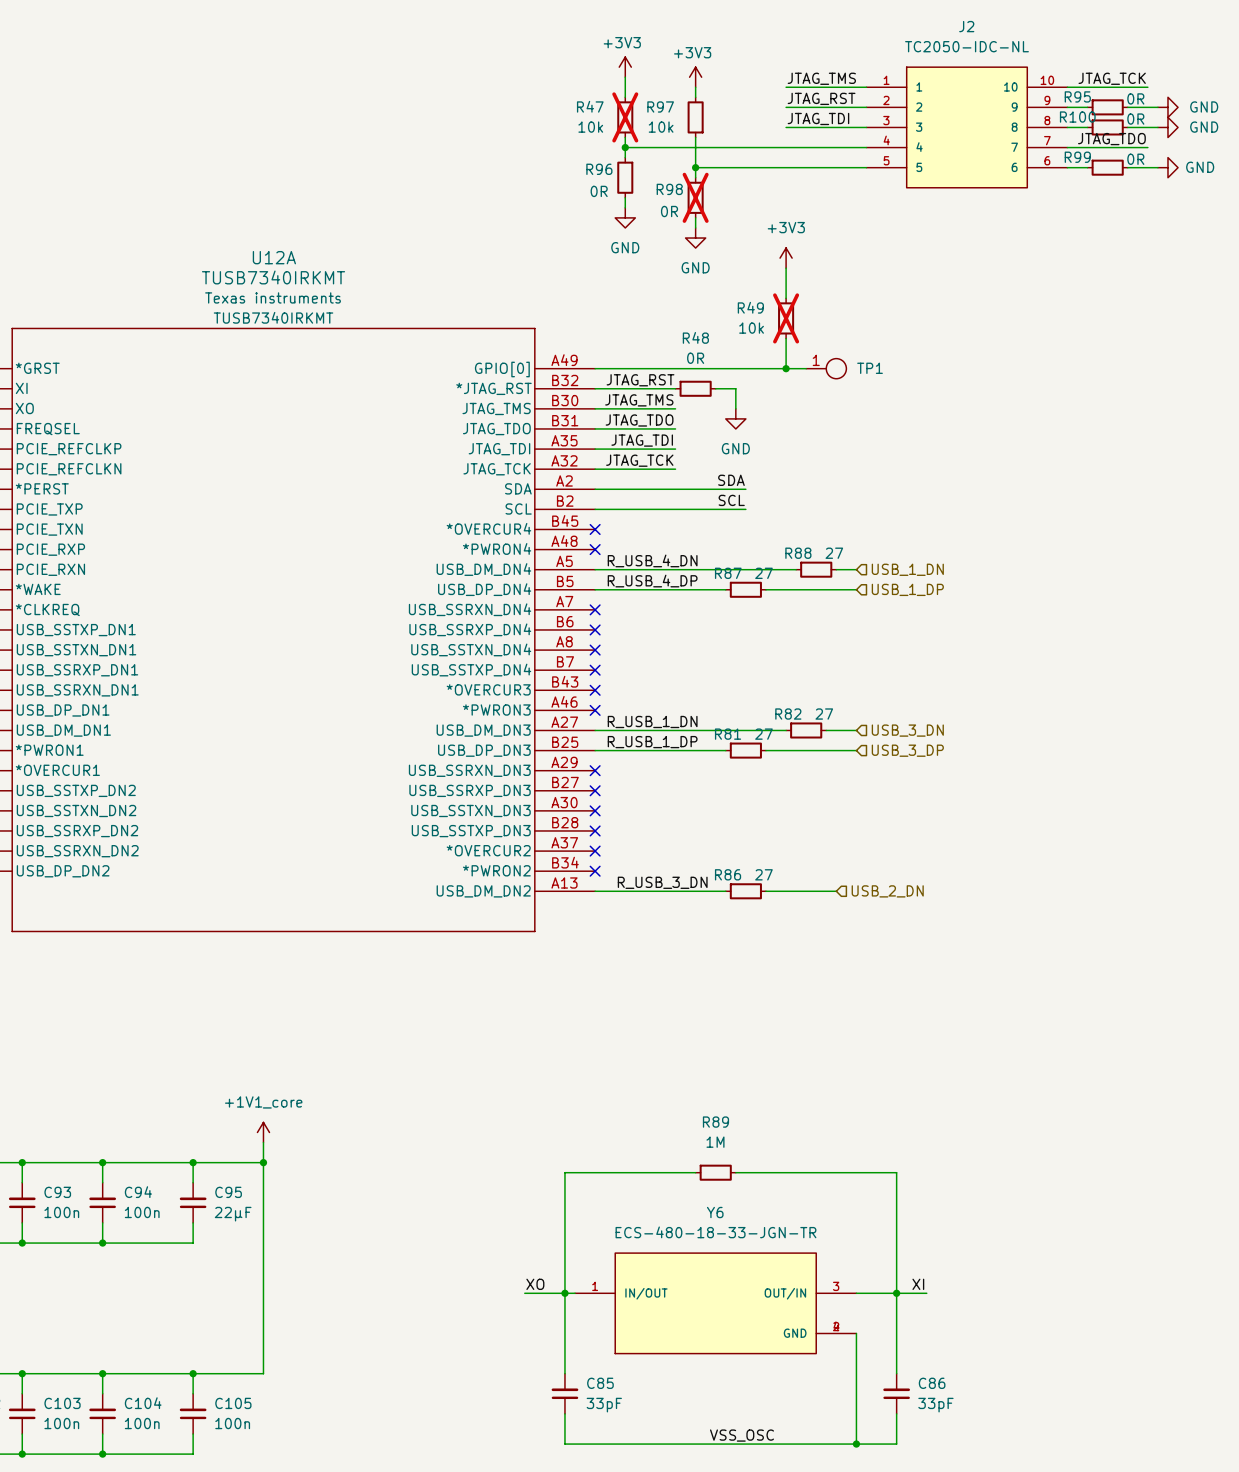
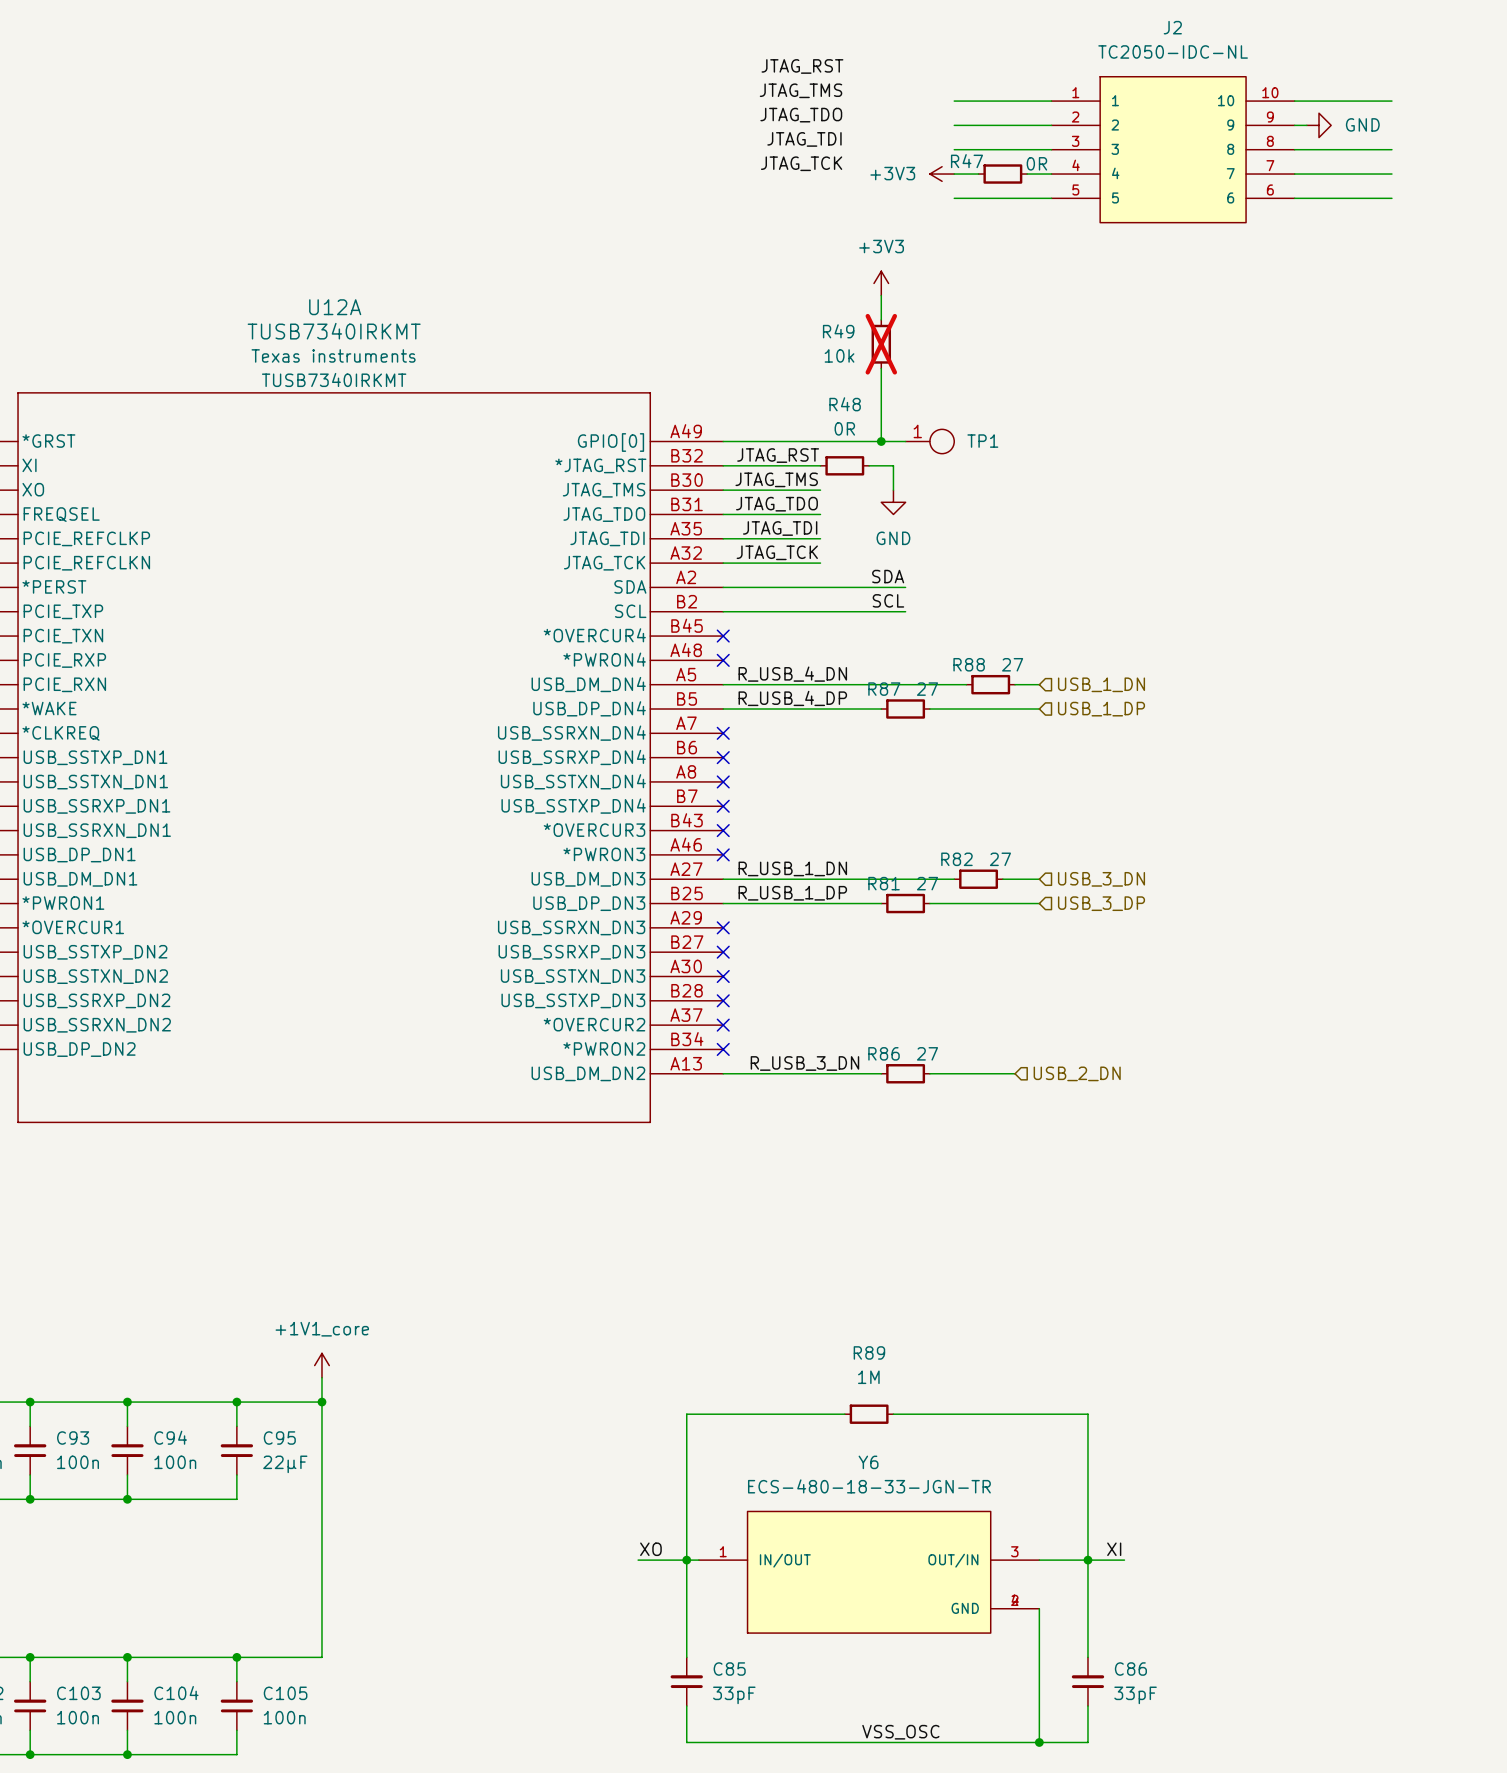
power symbol: +3V3 (625, 67) -> none
wire: (625, 77) (625, 97) -> none
power symbol: +3V3 (695, 77) -> none
label position: JTAG_TMS (821, 78) -> JTAG_TMS (801, 90)
label: JTAG_TCK (1112, 78) -> none
wire: (695, 87) (695, 97) -> none
label: none -> JTAG_TDO (801, 115)
label position: JTAG_RST (821, 98) -> JTAG_RST (802, 66)
power symbol: none -> GND (1319, 125)
R95: (1107, 107) -> none
wire: (1127, 107) (1157, 107) -> none
power symbol: GND (1167, 107) -> none
R47 rotation: 0° (625, 117) -> 90° clockwise (1002, 174)
R47 position: (625, 117) -> (1002, 174)
R47 do-not-place cross: (625, 117) -> none
R97: (695, 117) -> none
label position: JTAG_TDI (818, 118) -> JTAG_TDI (804, 139)
R47 text: 10k (590, 127) -> 0R (1036, 163)
wire: none -> (1319, 149) (1367, 149)
R100: (1107, 127) -> none
wire: (1147, 127) (1157, 127) -> none
power symbol: GND (1167, 127) -> none
wire: (625, 137) (625, 157) -> (881, 295) (881, 319)
wire: (695, 137) (695, 177) -> none
label: none -> JTAG_TCK (801, 163)
label: JTAG_TDO (1111, 139) -> none
wire: (625, 147) (786, 147) -> none
junction: (625, 147) -> none
power symbol: none -> +3V3 (942, 174)
wire: (806, 147) (846, 147) -> none
wire: (695, 167) (786, 167) -> none
junction: (695, 167) -> none
wire: none -> (1319, 198) (1367, 198)
R99: (1107, 167) -> none
wire: (1147, 167) (1157, 167) -> none
power symbol: GND (1167, 167) -> none
R96: (625, 177) -> none
wire: (625, 197) (625, 207) -> none
R98: (695, 197) -> none
power symbol: GND (625, 217) -> none
wire: (695, 217) (695, 227) -> none
power symbol: GND (695, 238) -> none
power symbol: none -> +3V3 (881, 283)
power symbol: +3V3 (786, 258) -> none
wire: (786, 268) (786, 298) -> none
wire: none -> (881, 368) (881, 441)
R49 position: (786, 318) -> (881, 344)
wire: (786, 338) (786, 368) -> none
junction: none -> (881, 441)
wire: (745, 368) (806, 368) -> none
junction: (786, 368) -> none
TP1 position: (826, 368) -> (929, 441)

